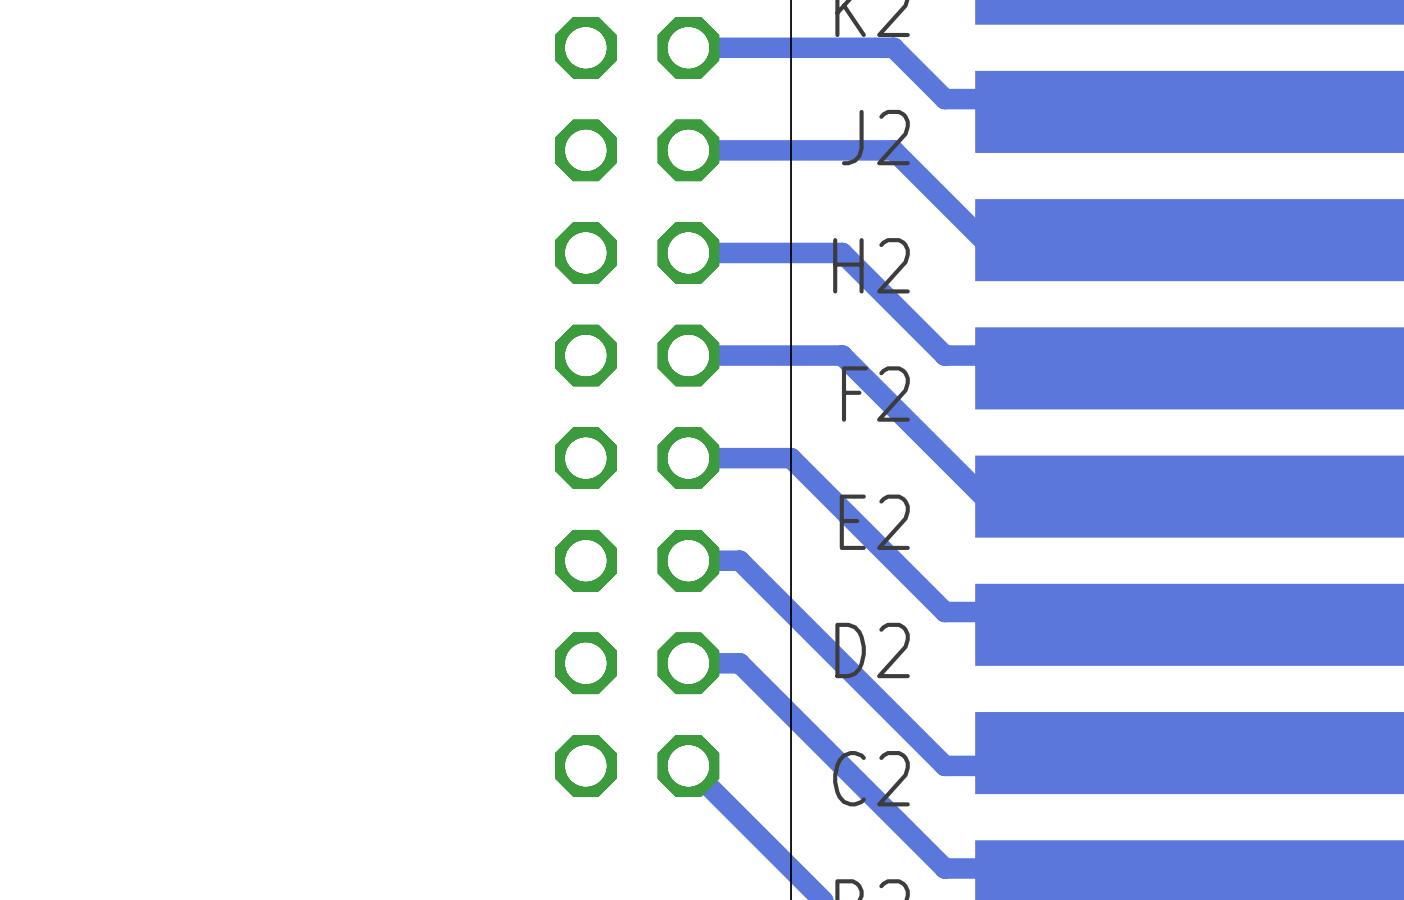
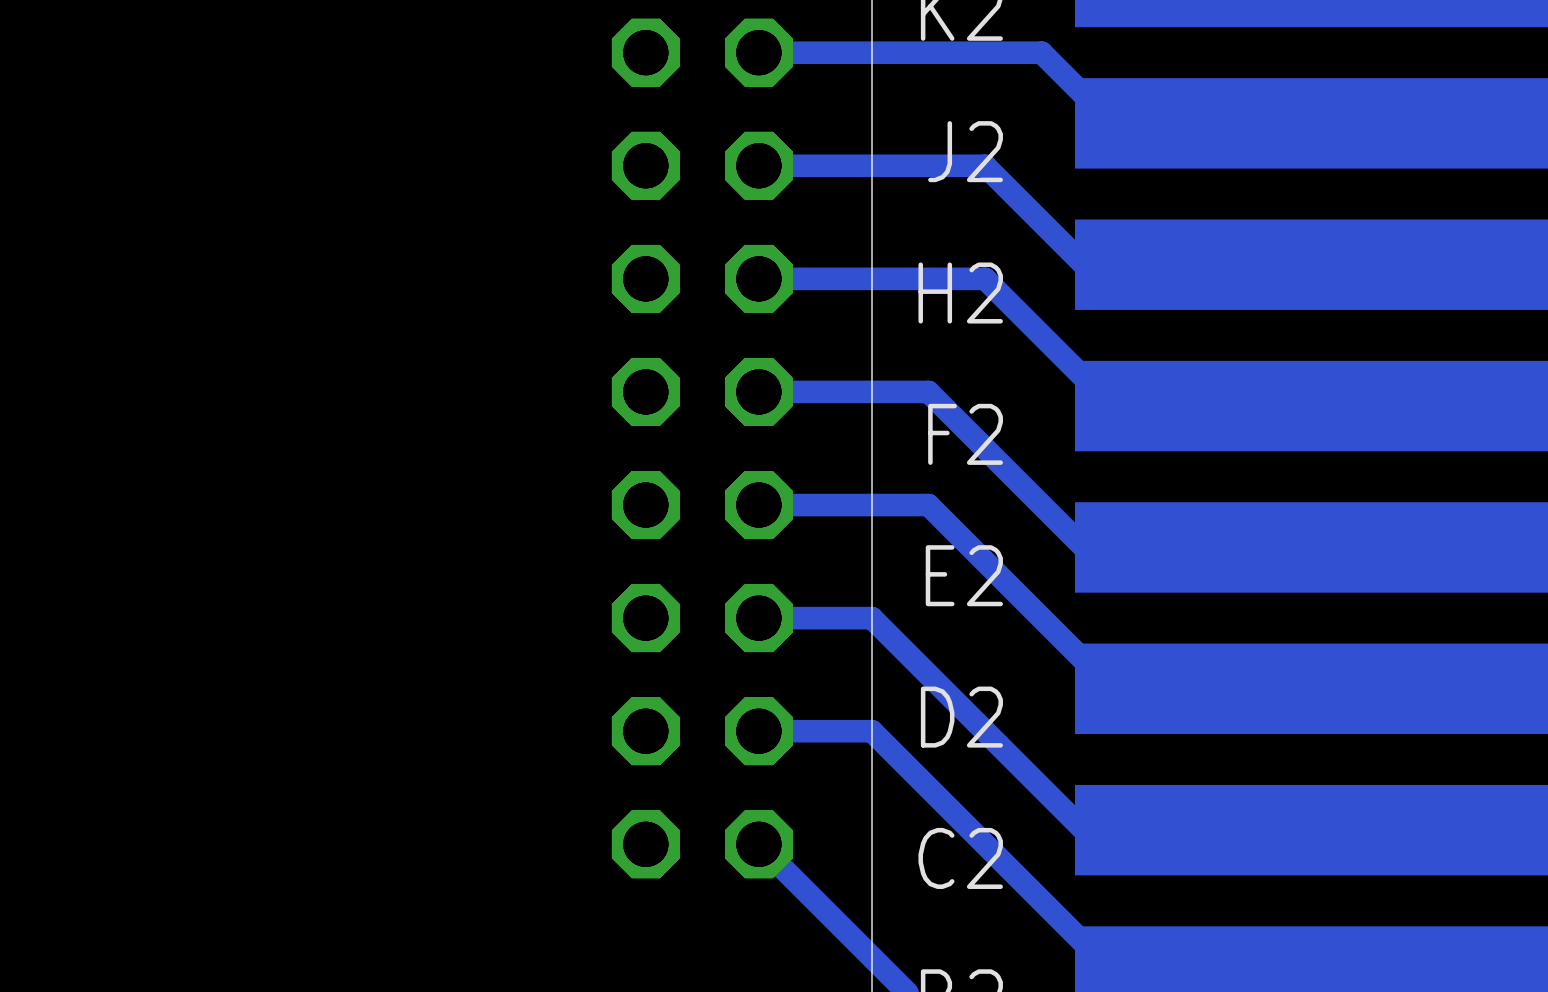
track: (893, 47) (944, 99) (996, 99) -> (985, 52) (1041, 52) (1098, 109)
track: (842, 252) (944, 355) (996, 355) -> (928, 278) (985, 278) (1098, 391)
track: (791, 458) (944, 612) (996, 612) -> (872, 505) (928, 505) (1098, 674)
track: (739, 560) (944, 765) (996, 765) -> (815, 618) (872, 618) (1098, 844)
track: (739, 663) (944, 868) (996, 868) -> (815, 731) (872, 731) (1098, 957)

